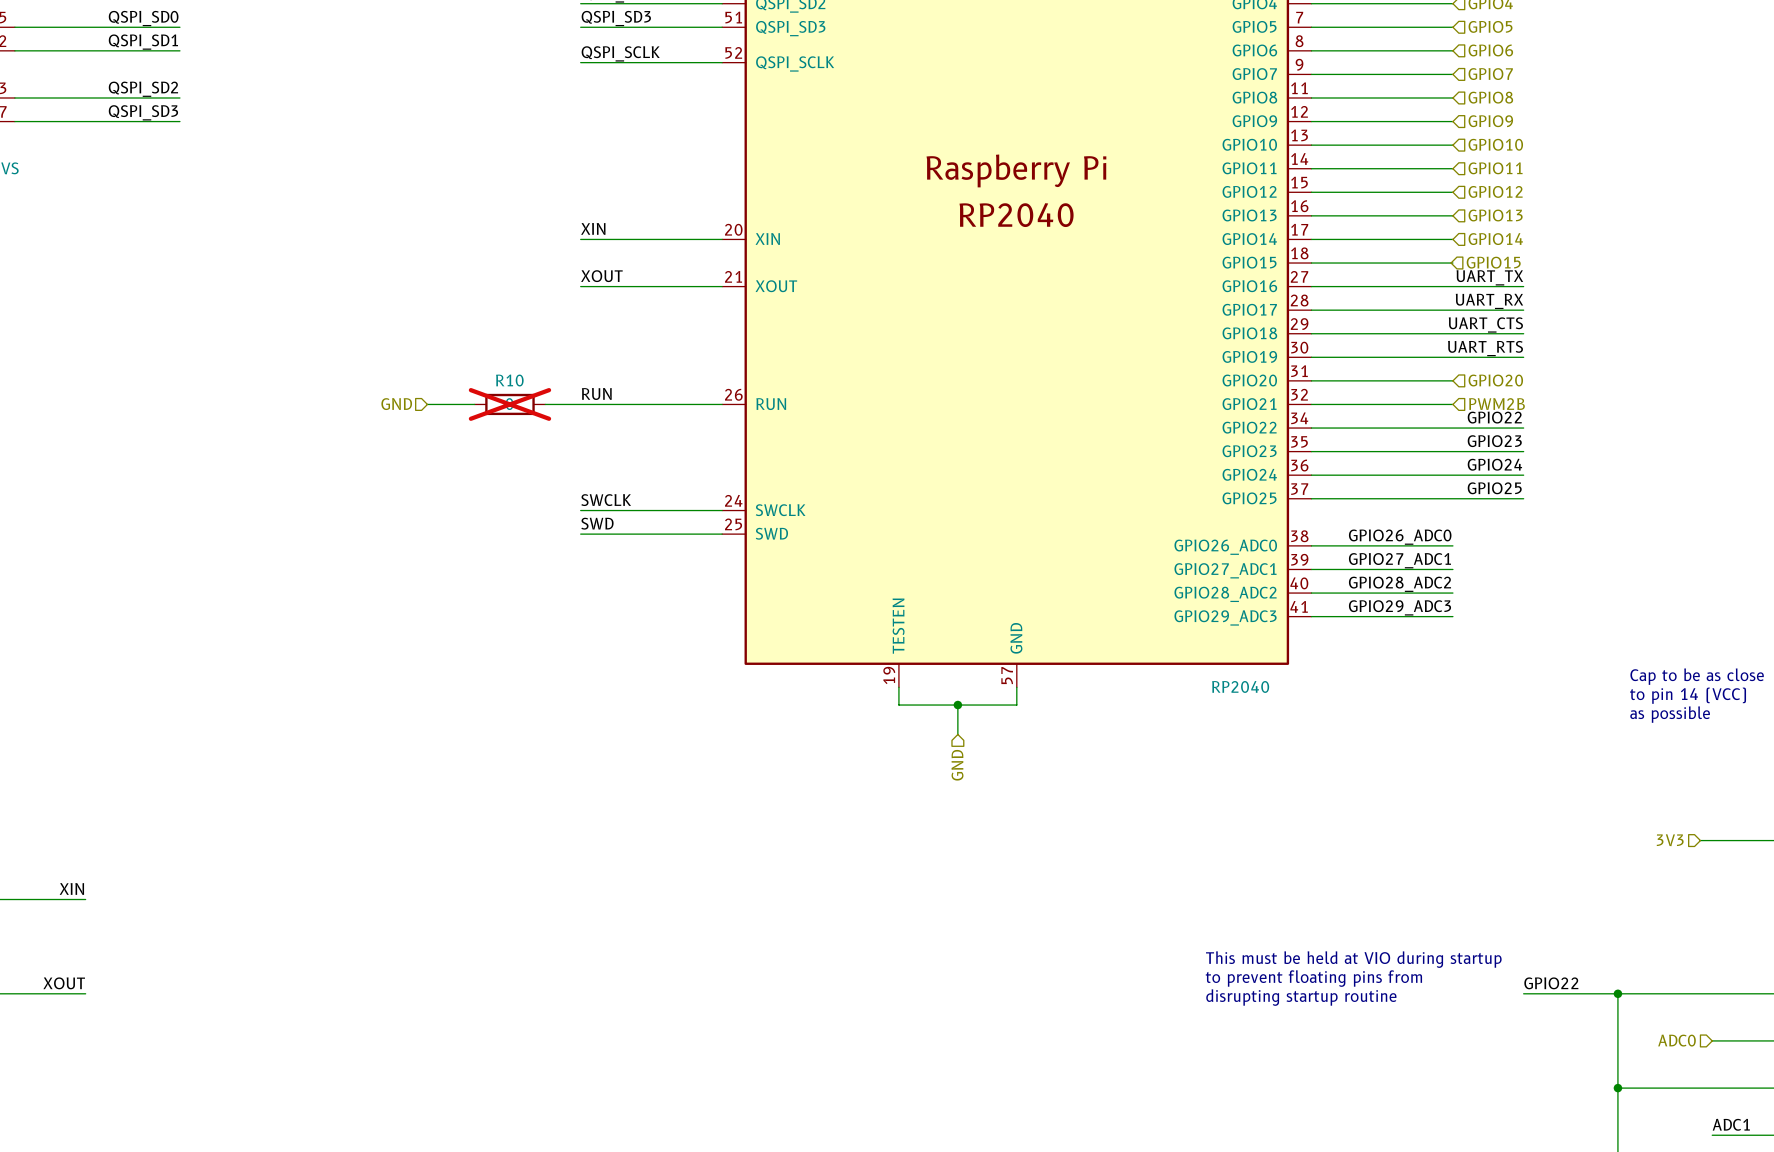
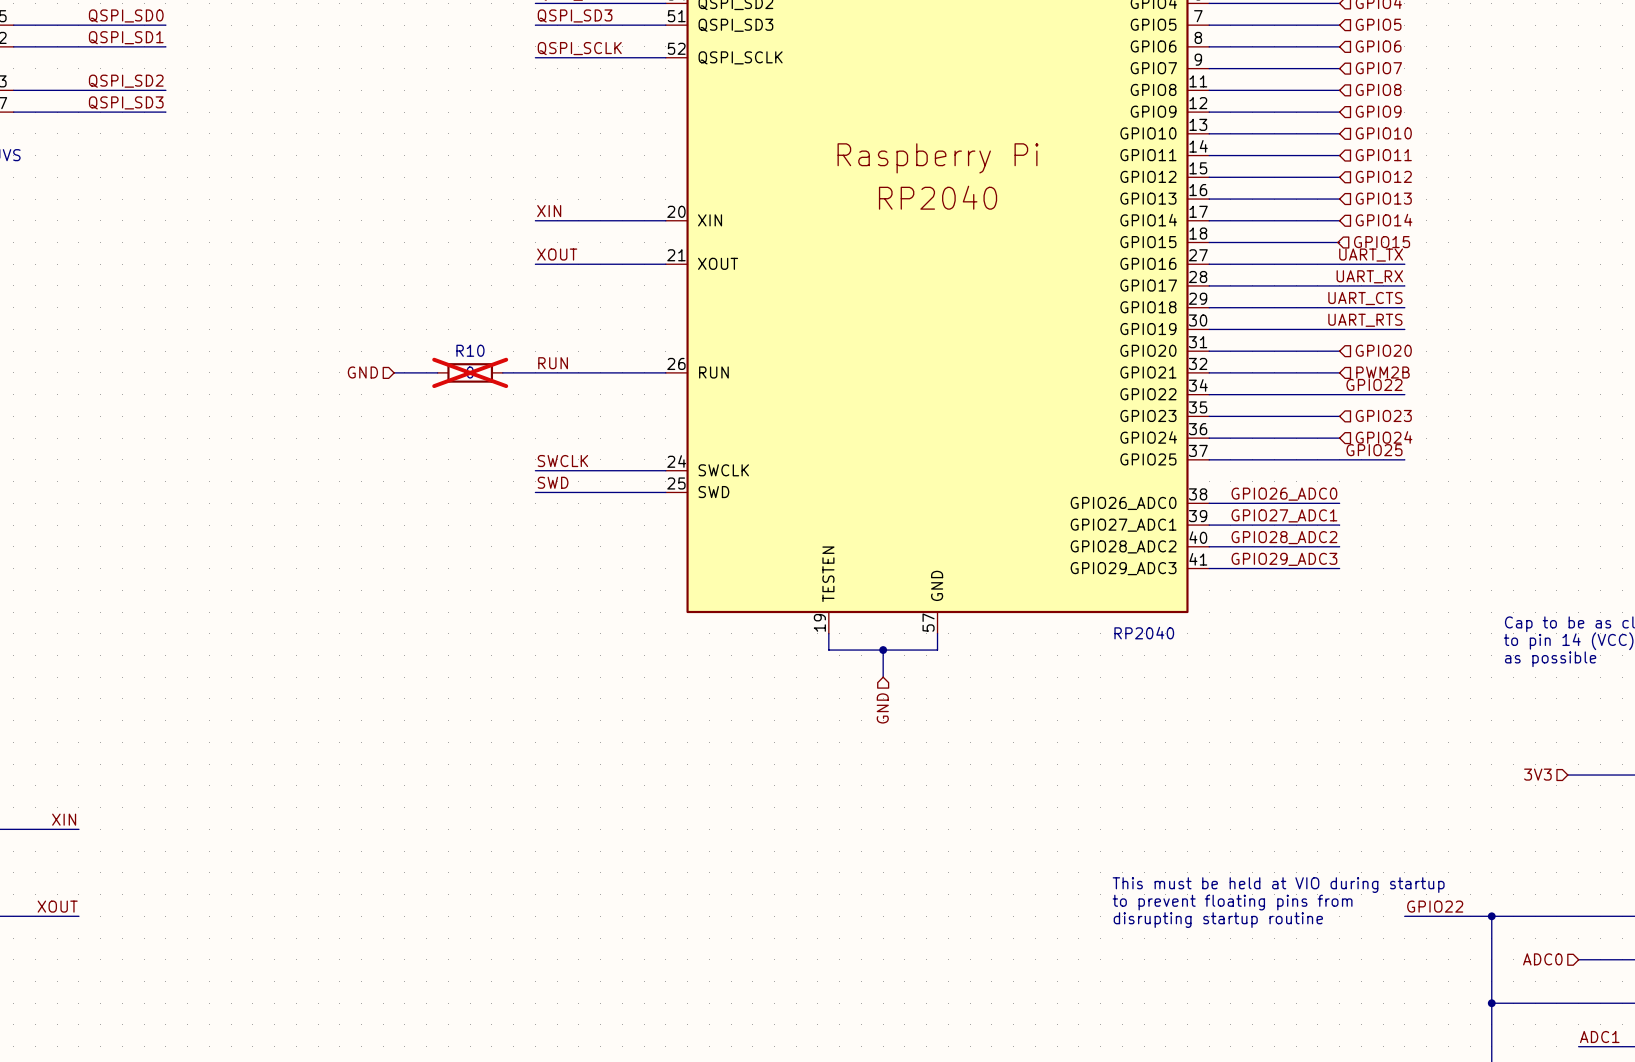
label: GPIO23 (1494, 441) -> none
wire: (1452, 451) (1523, 451) -> none
hierarchical label: none -> GPIO23 (1383, 415)
label: GPIO24 (1494, 464) -> none
hierarchical label: none -> GPIO24 (1384, 437)
wire: (1452, 475) (1523, 475) -> none

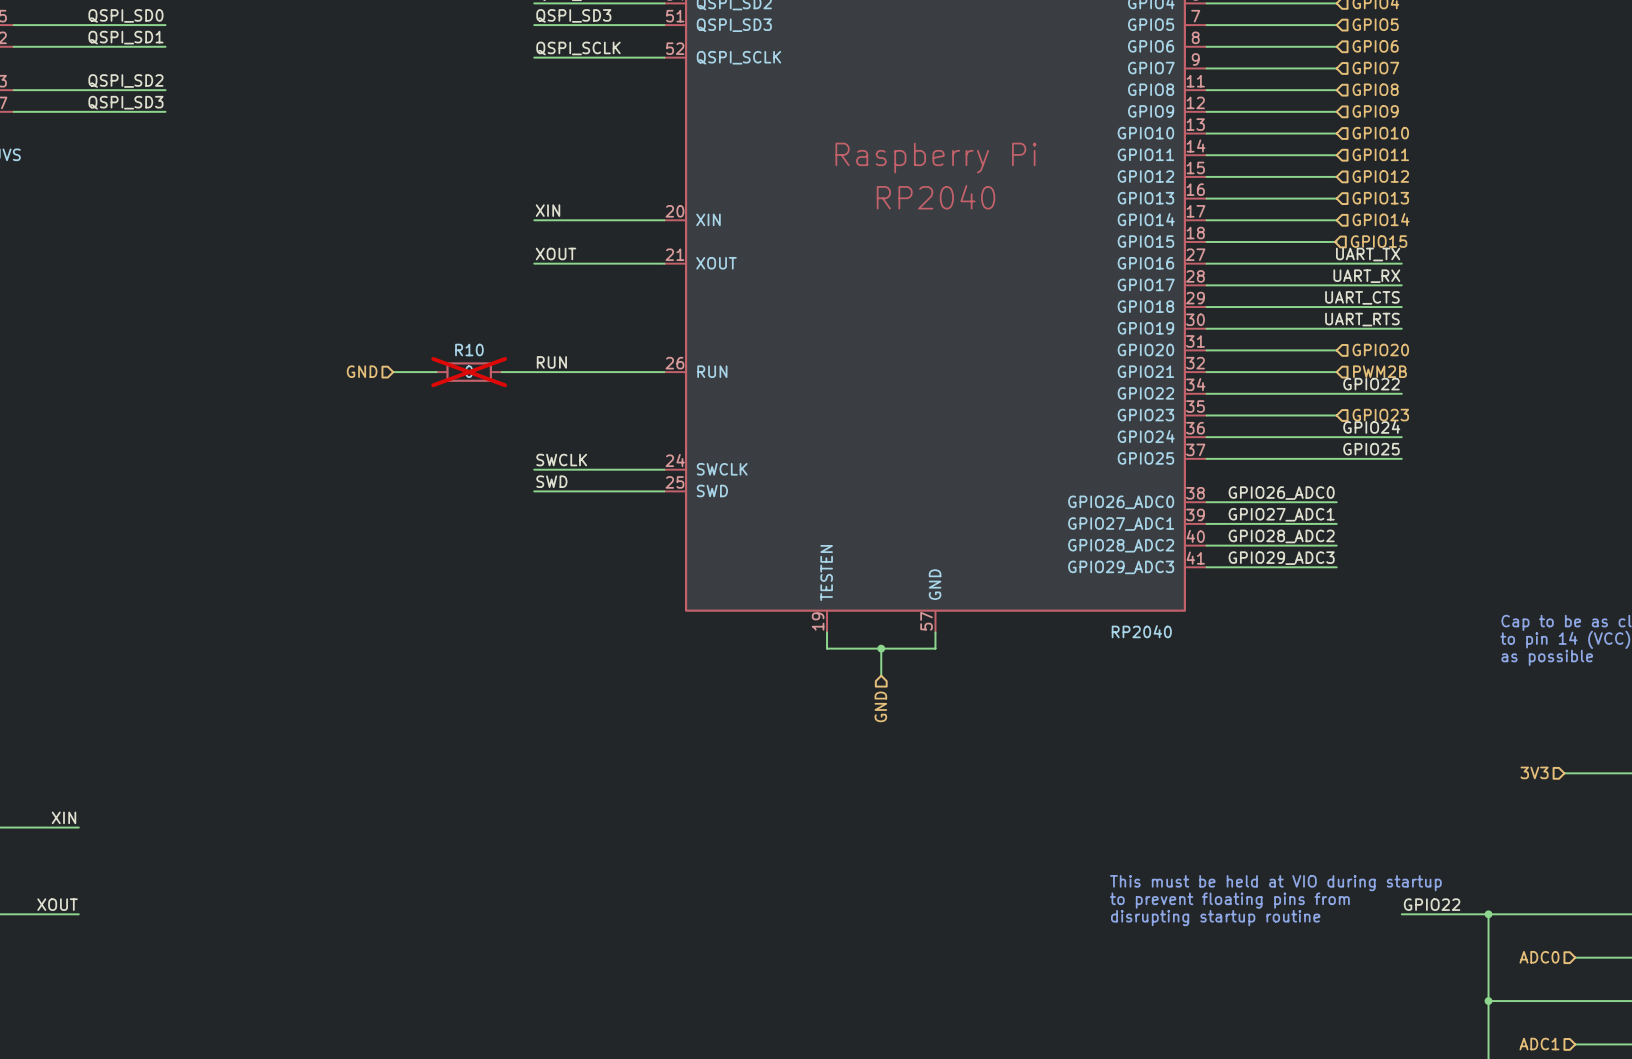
label: none -> GPIO24 (1371, 427)
hierarchical label: GPIO24 (1384, 437) -> none
wire: none -> (1336, 437) (1401, 437)
label: ADC1 (1599, 1037) -> none
hierarchical label: none -> ADC1 (1539, 1044)

